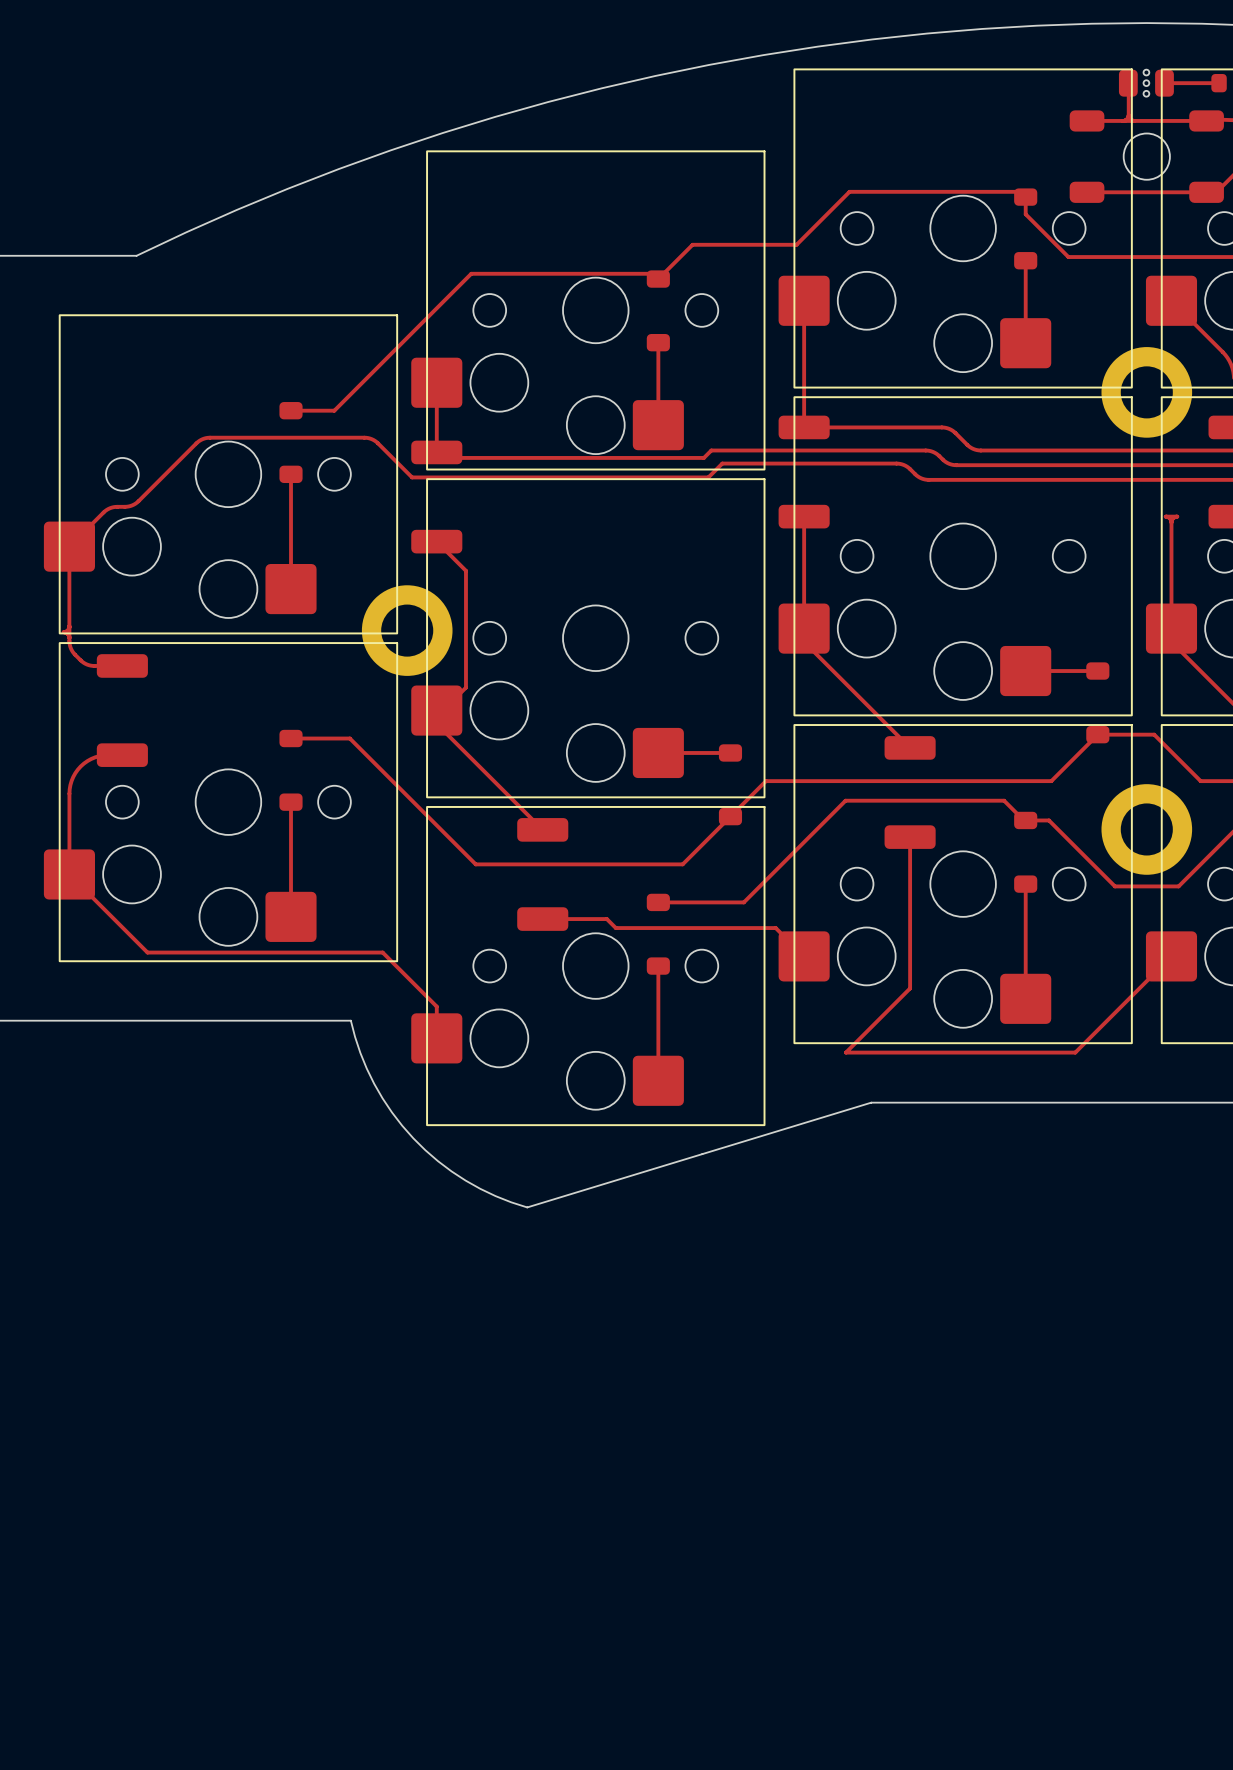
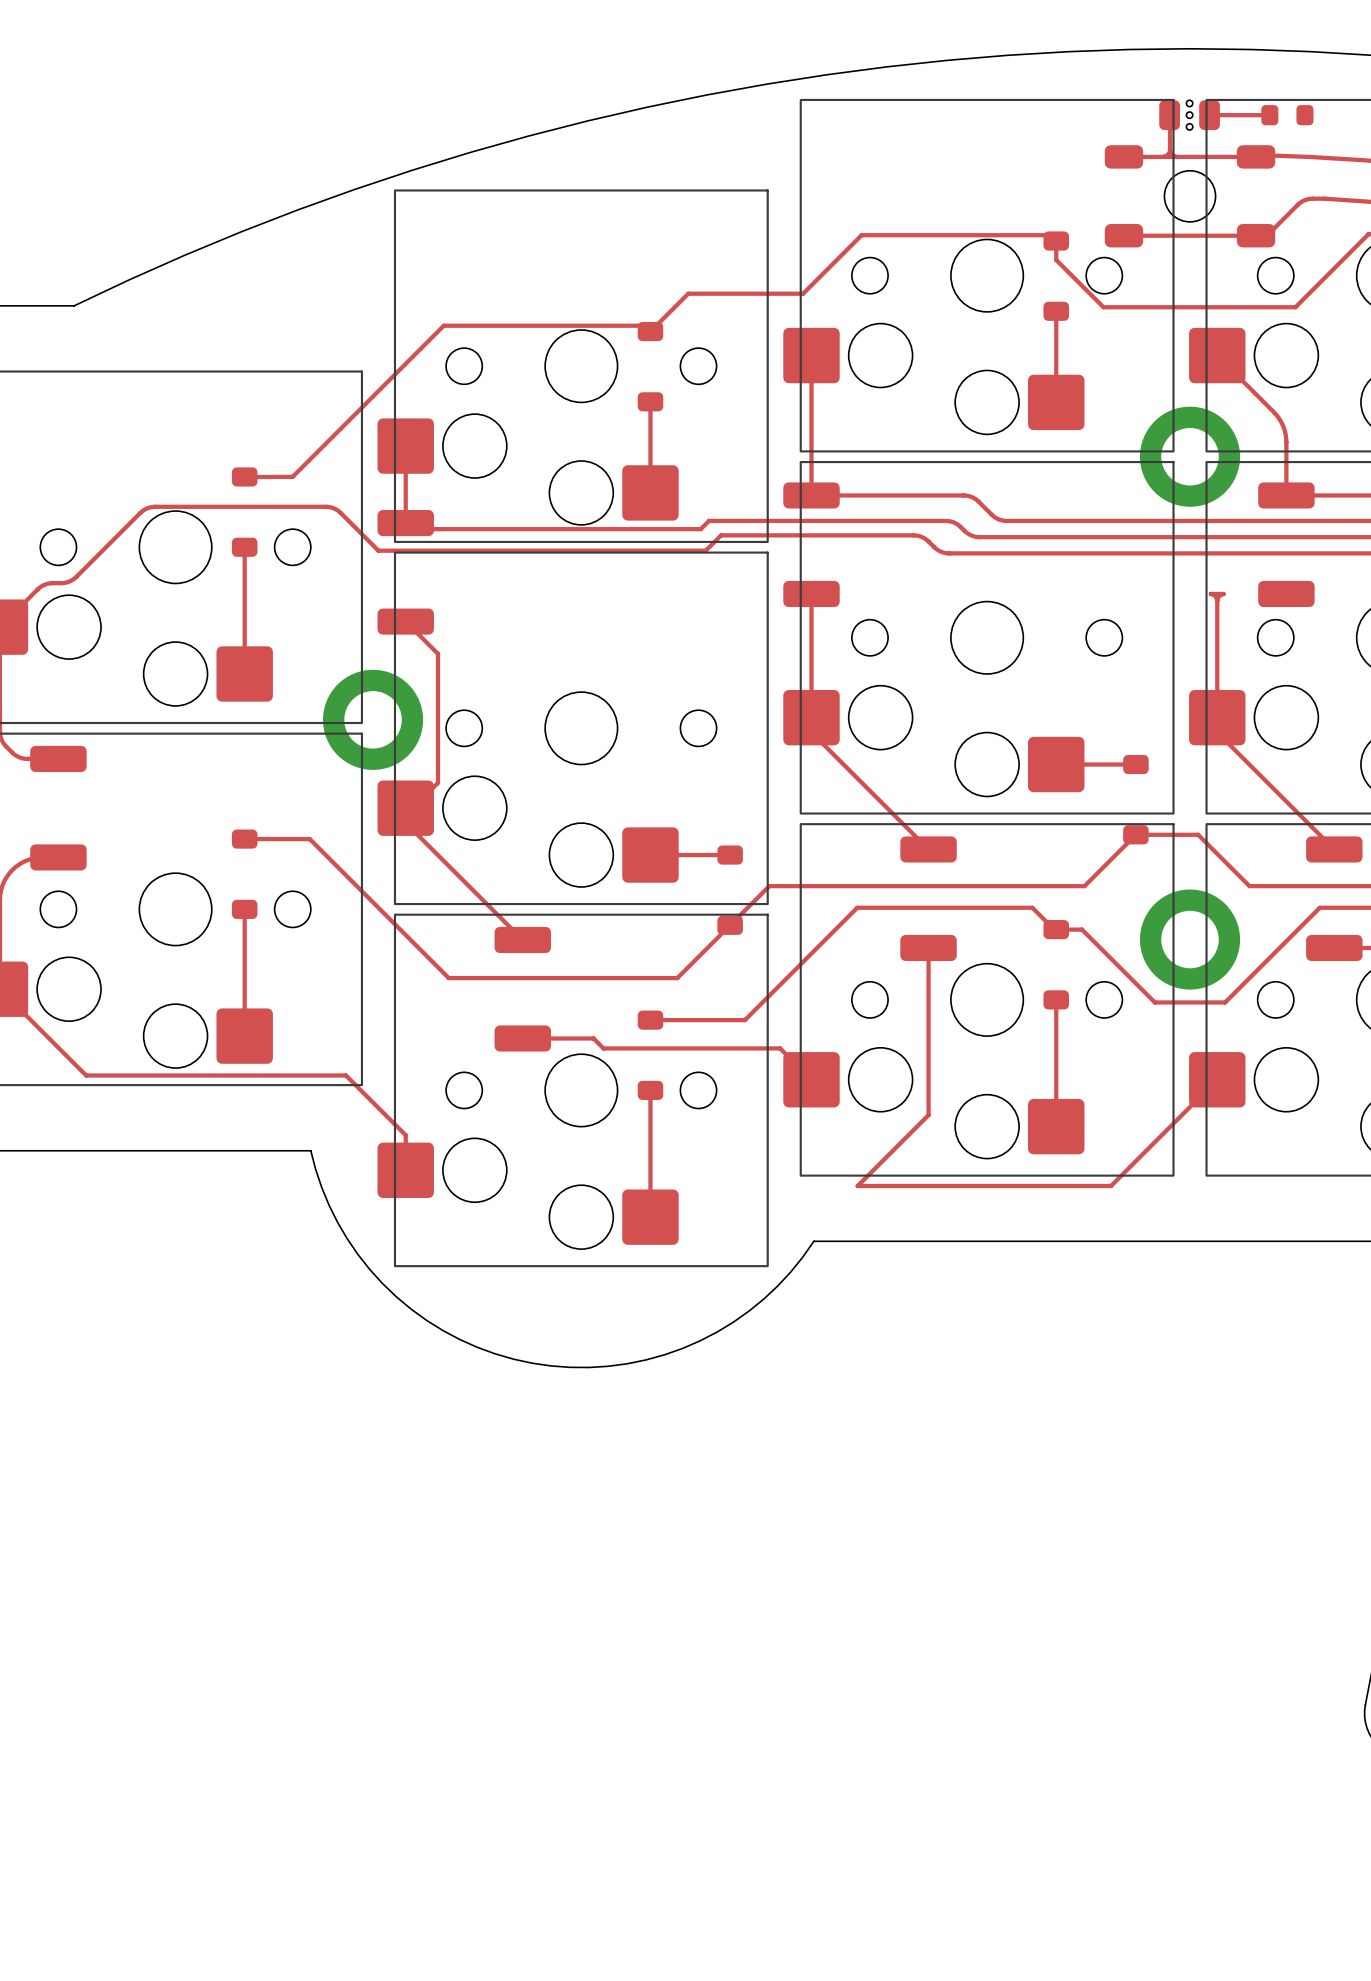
board edge: (350, 1020) (360, 1053) (374, 1083) (391, 1112) (413, 1138) (438, 1161) (465, 1180) (495, 1196) (527, 1207) (871, 1102) -> (310, 1150) (329, 1205) (347, 1238) (369, 1269) (396, 1296) (426, 1320) (459, 1339) (495, 1353) (532, 1363) (589, 1367) (627, 1363) (664, 1354) (700, 1340) (749, 1311) (777, 1285) (813, 1241) (885, 1241)

